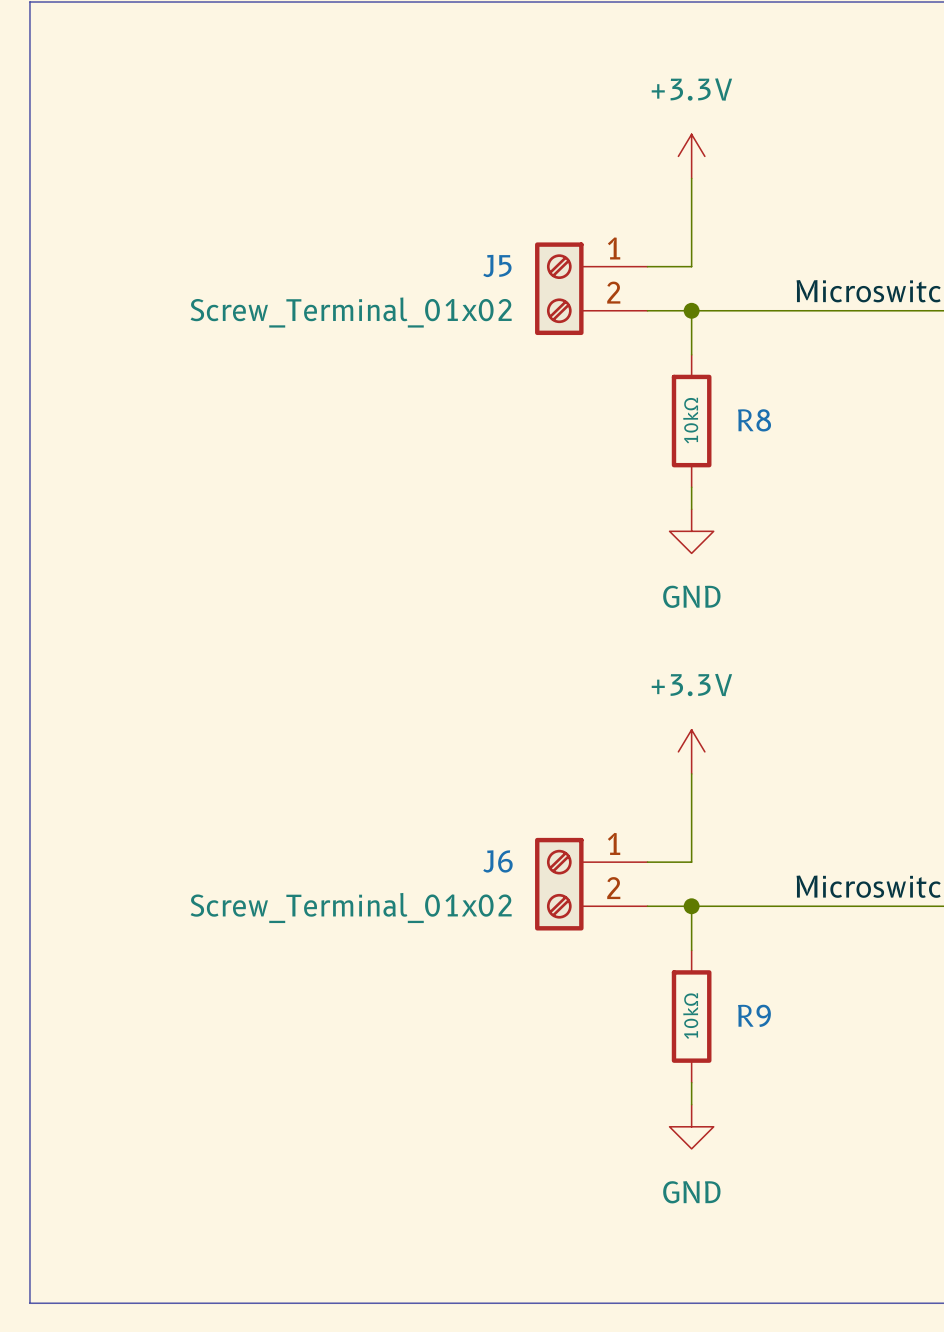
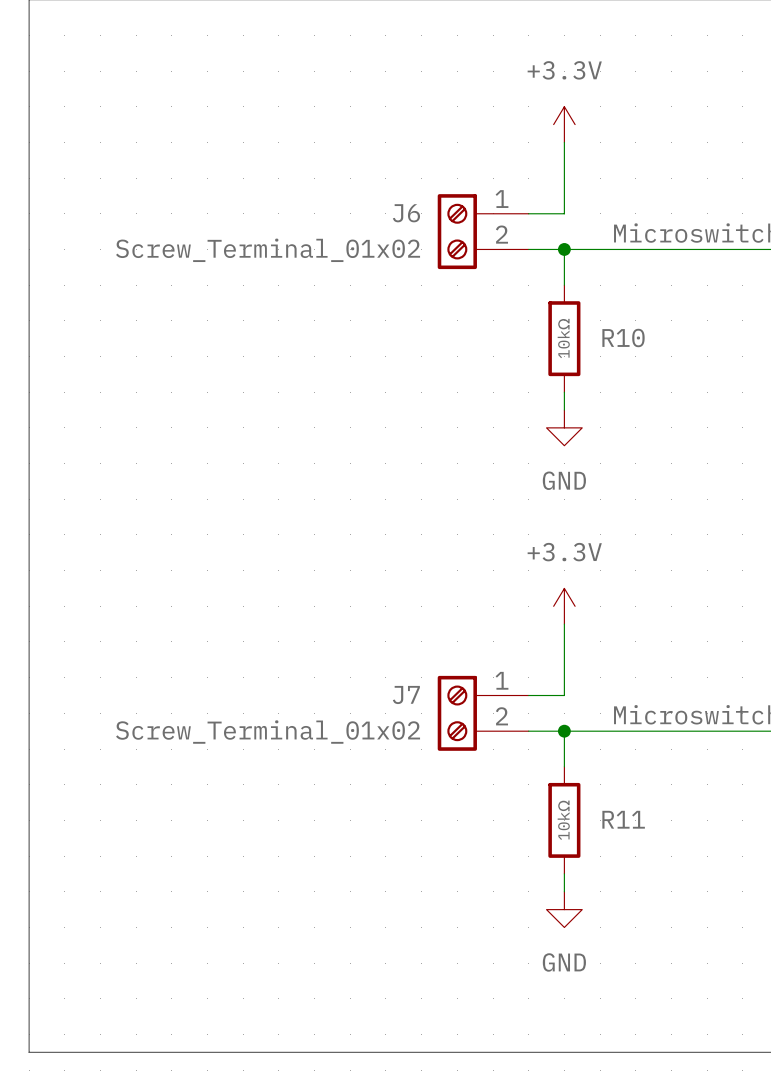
J5 name: J5 (497, 265) -> J6 (406, 213)
R8 name: R8 (754, 420) -> R10 (623, 338)
J6 name: J6 (497, 861) -> J7 (406, 694)
R9 name: R9 (754, 1015) -> R11 (623, 819)

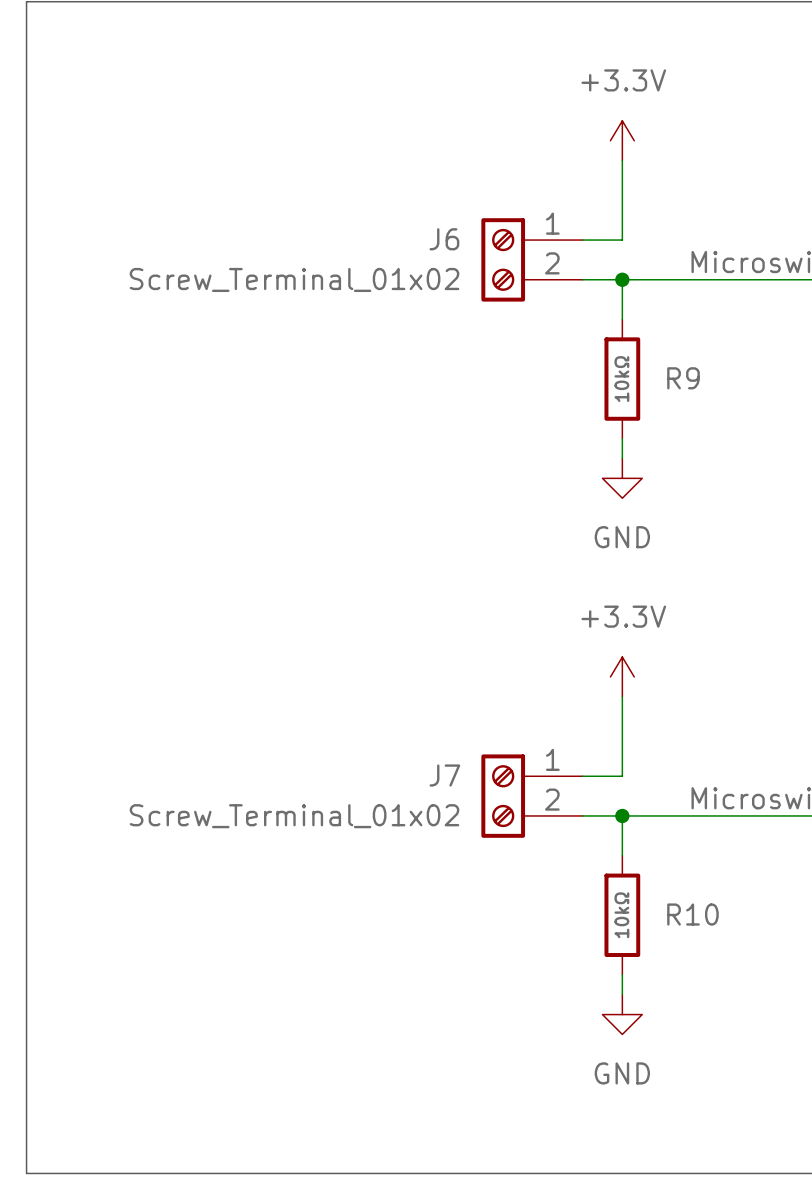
R10 name: R10 (623, 338) -> R9 (683, 378)
R11 name: R11 (623, 819) -> R10 (692, 914)

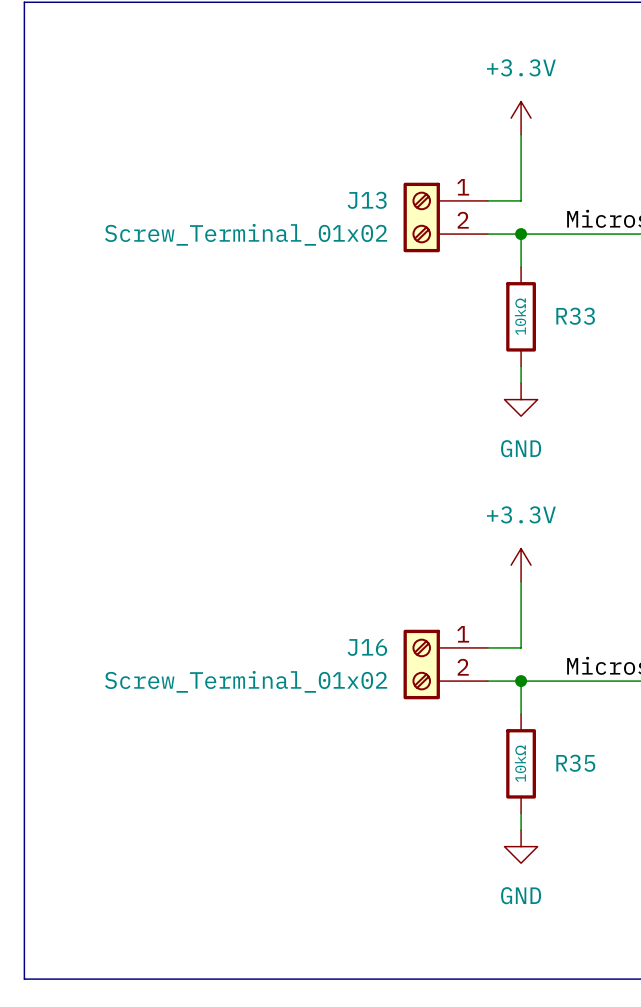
J6 name: J6 (444, 239) -> J13 (367, 200)
R9 name: R9 (683, 378) -> R33 (575, 316)
J7 name: J7 (444, 775) -> J16 (367, 647)
R10 name: R10 (692, 914) -> R35 (575, 763)

